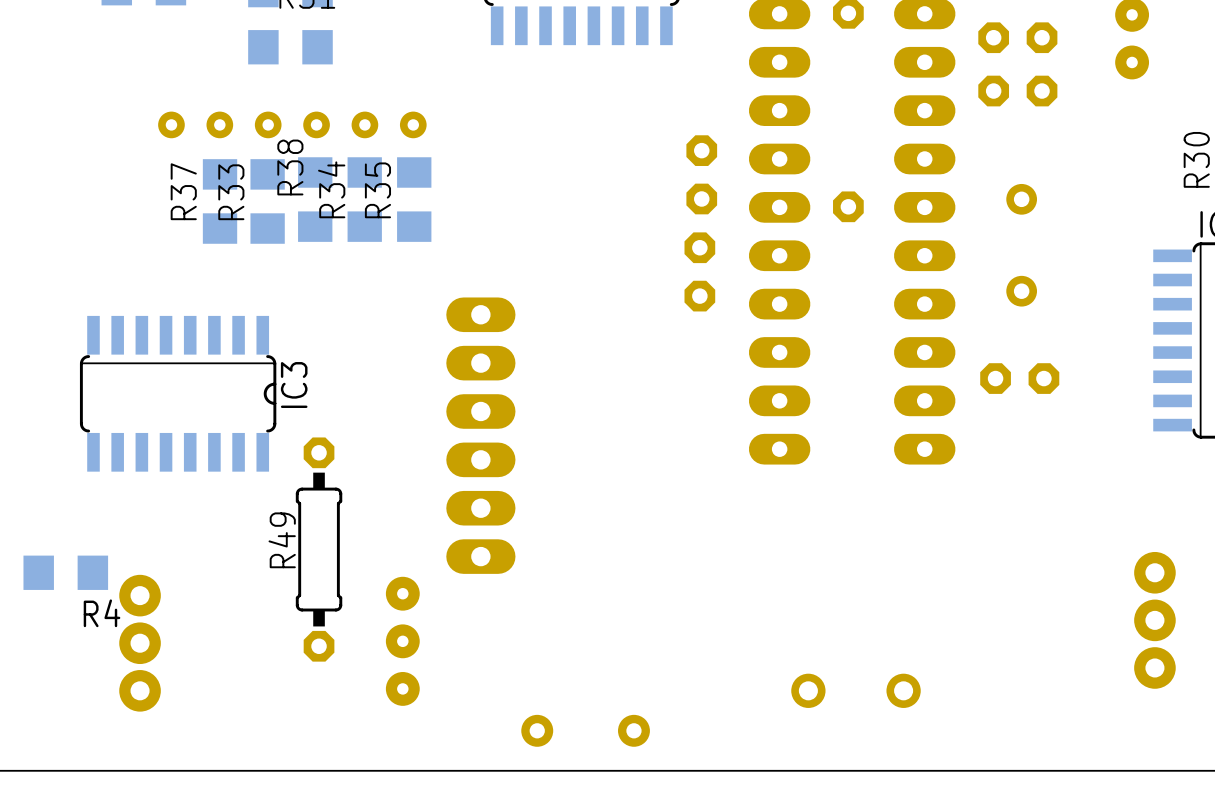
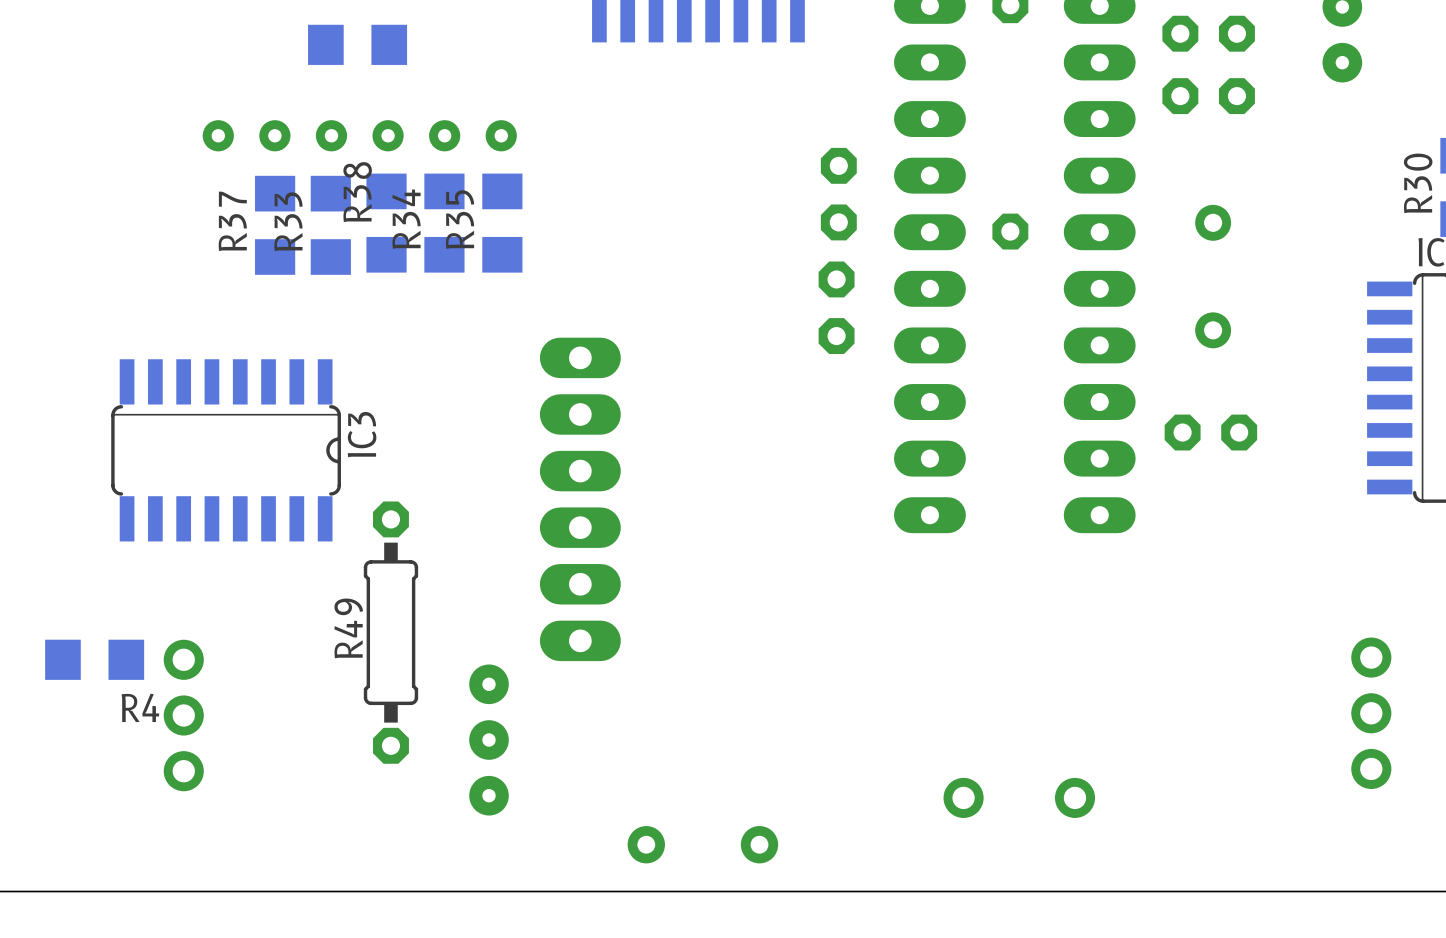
part footprint: [1134, 551, 1176, 689] -> [1351, 637, 1392, 790]
part: none -> (183, 715)
part: (140, 643) -> none

